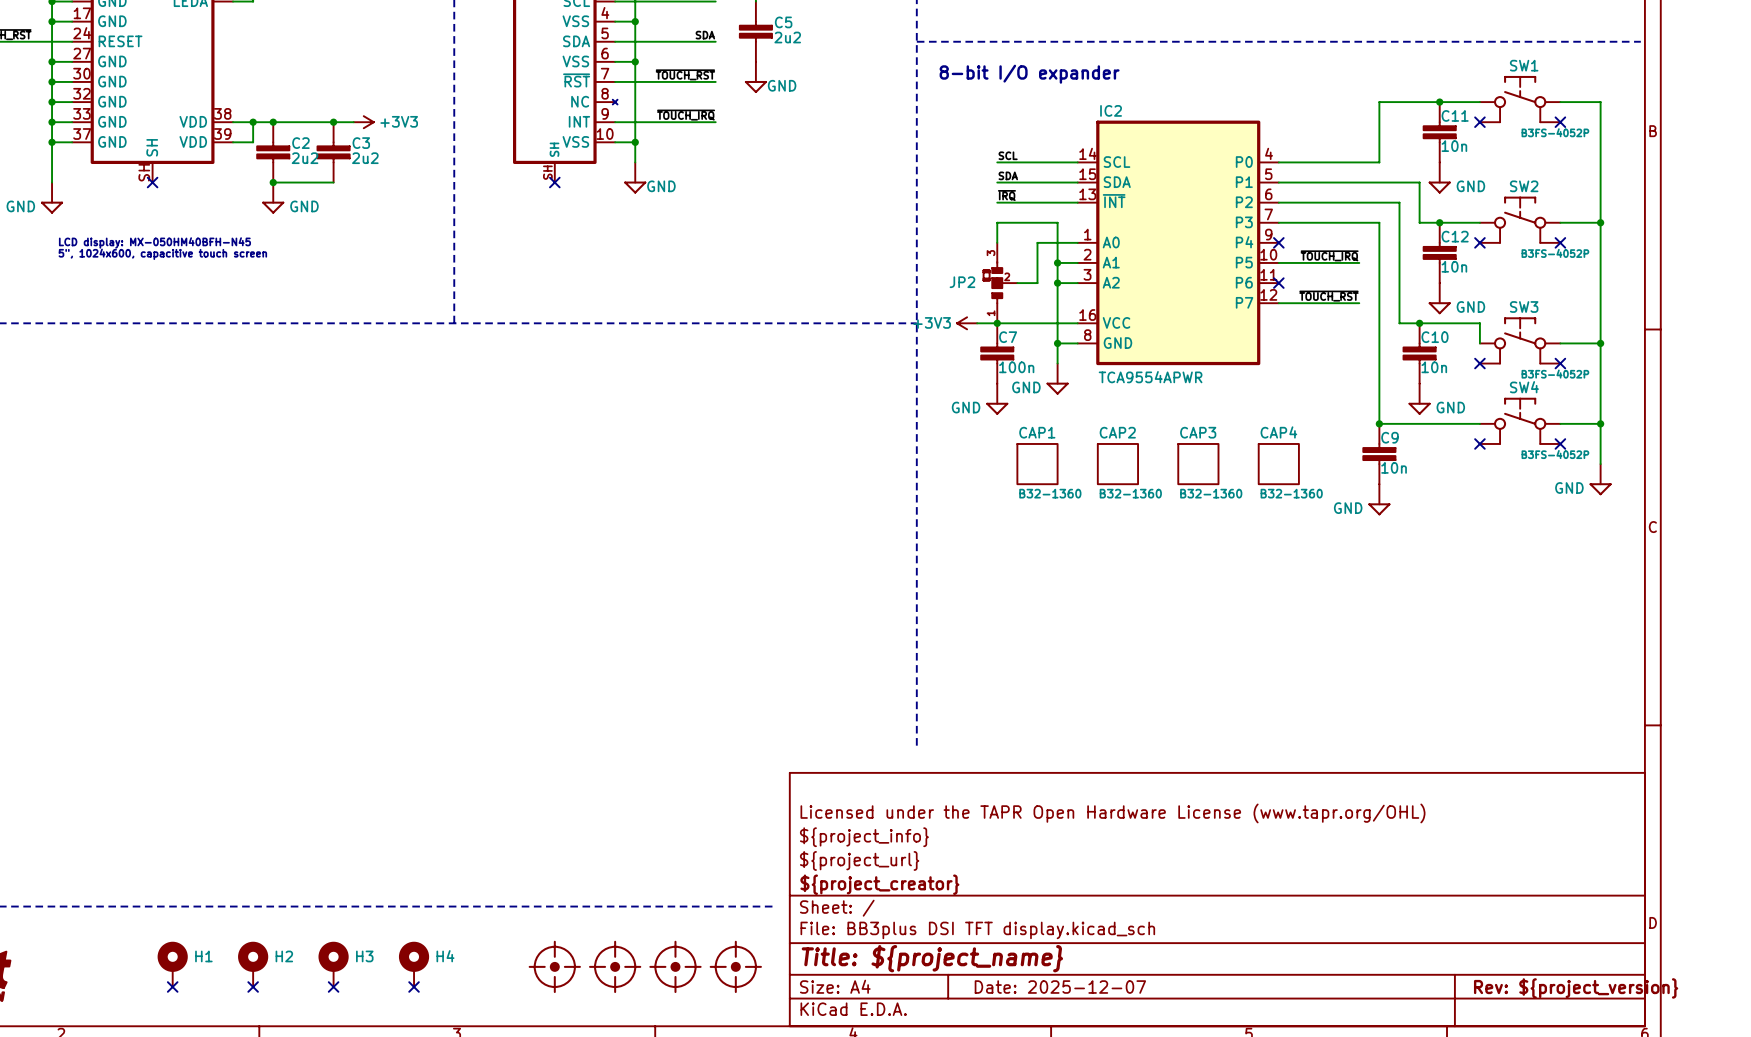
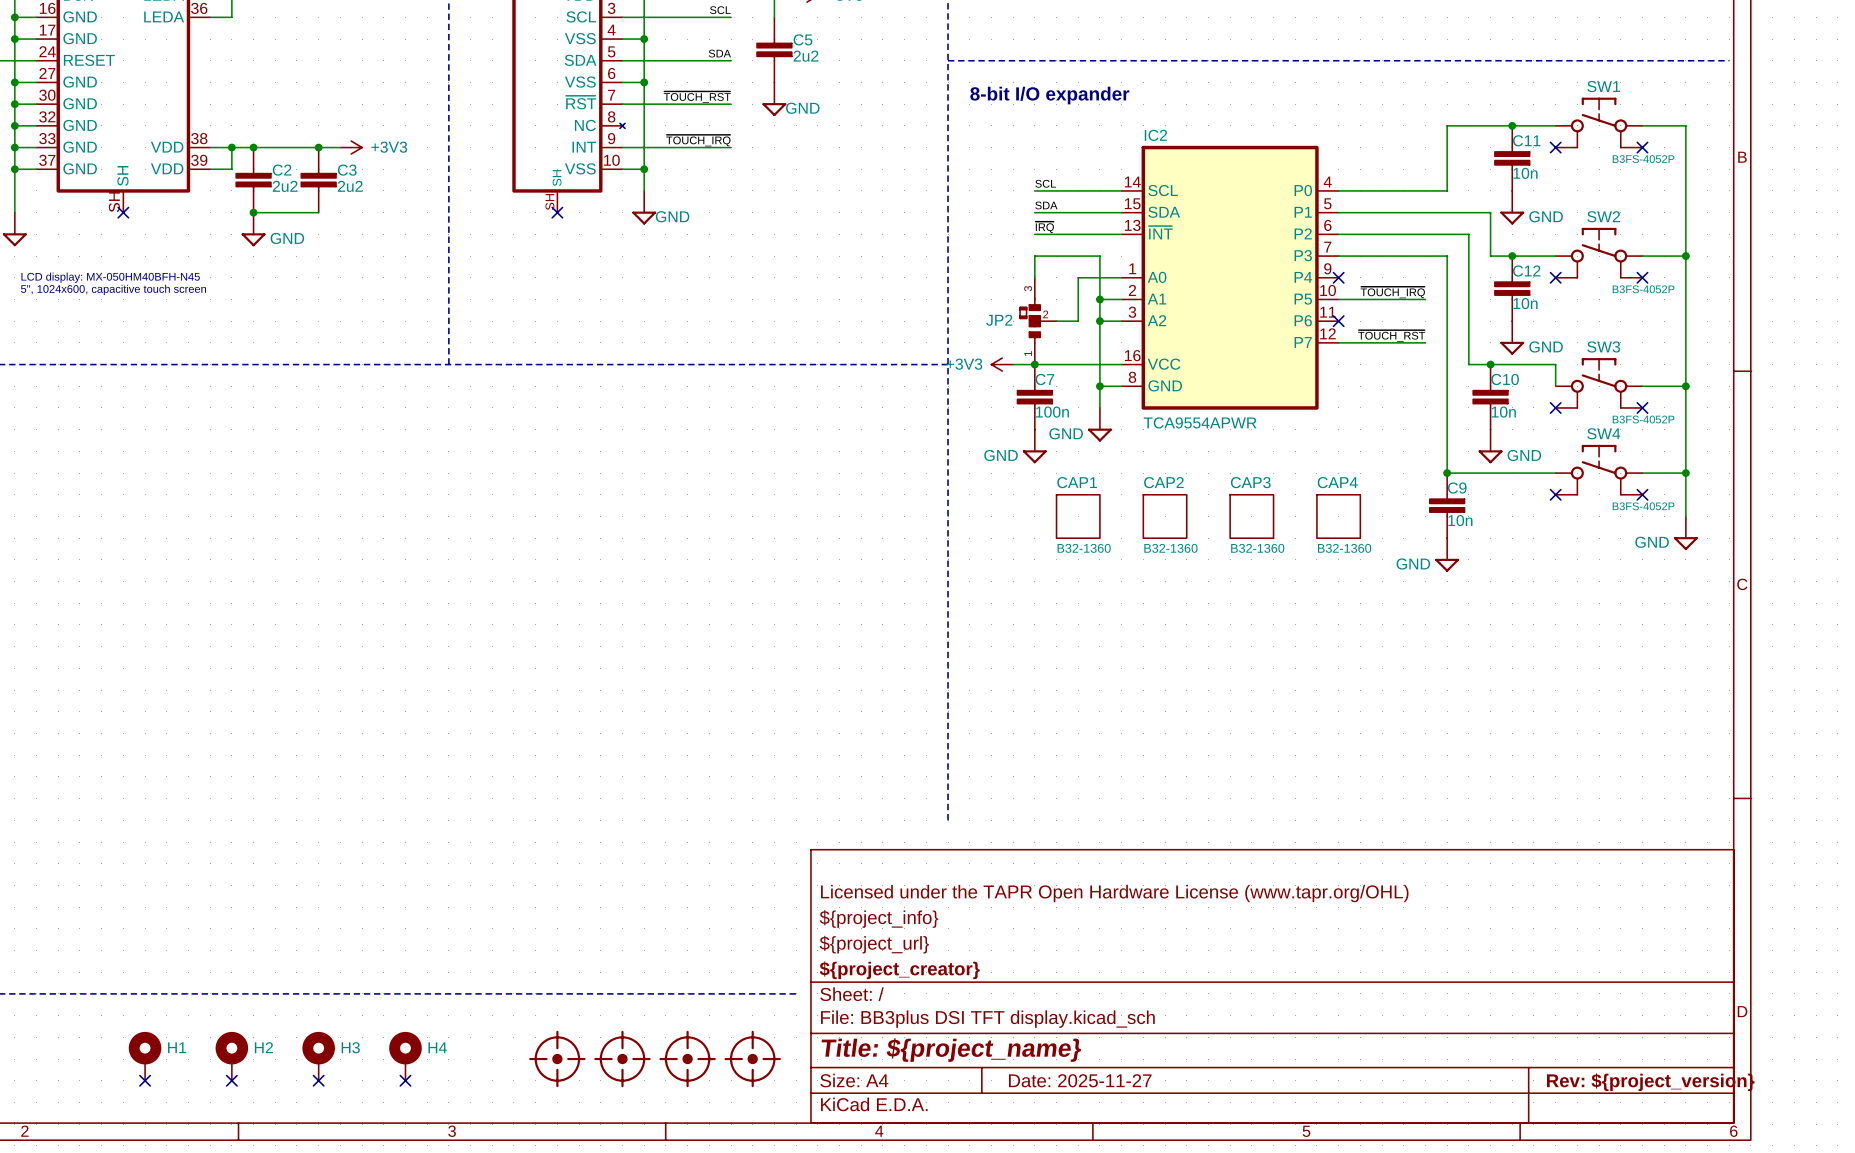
title block: Date: 2025-12-07 (1060, 987) -> Date: 2025-11-27 (1080, 1080)

